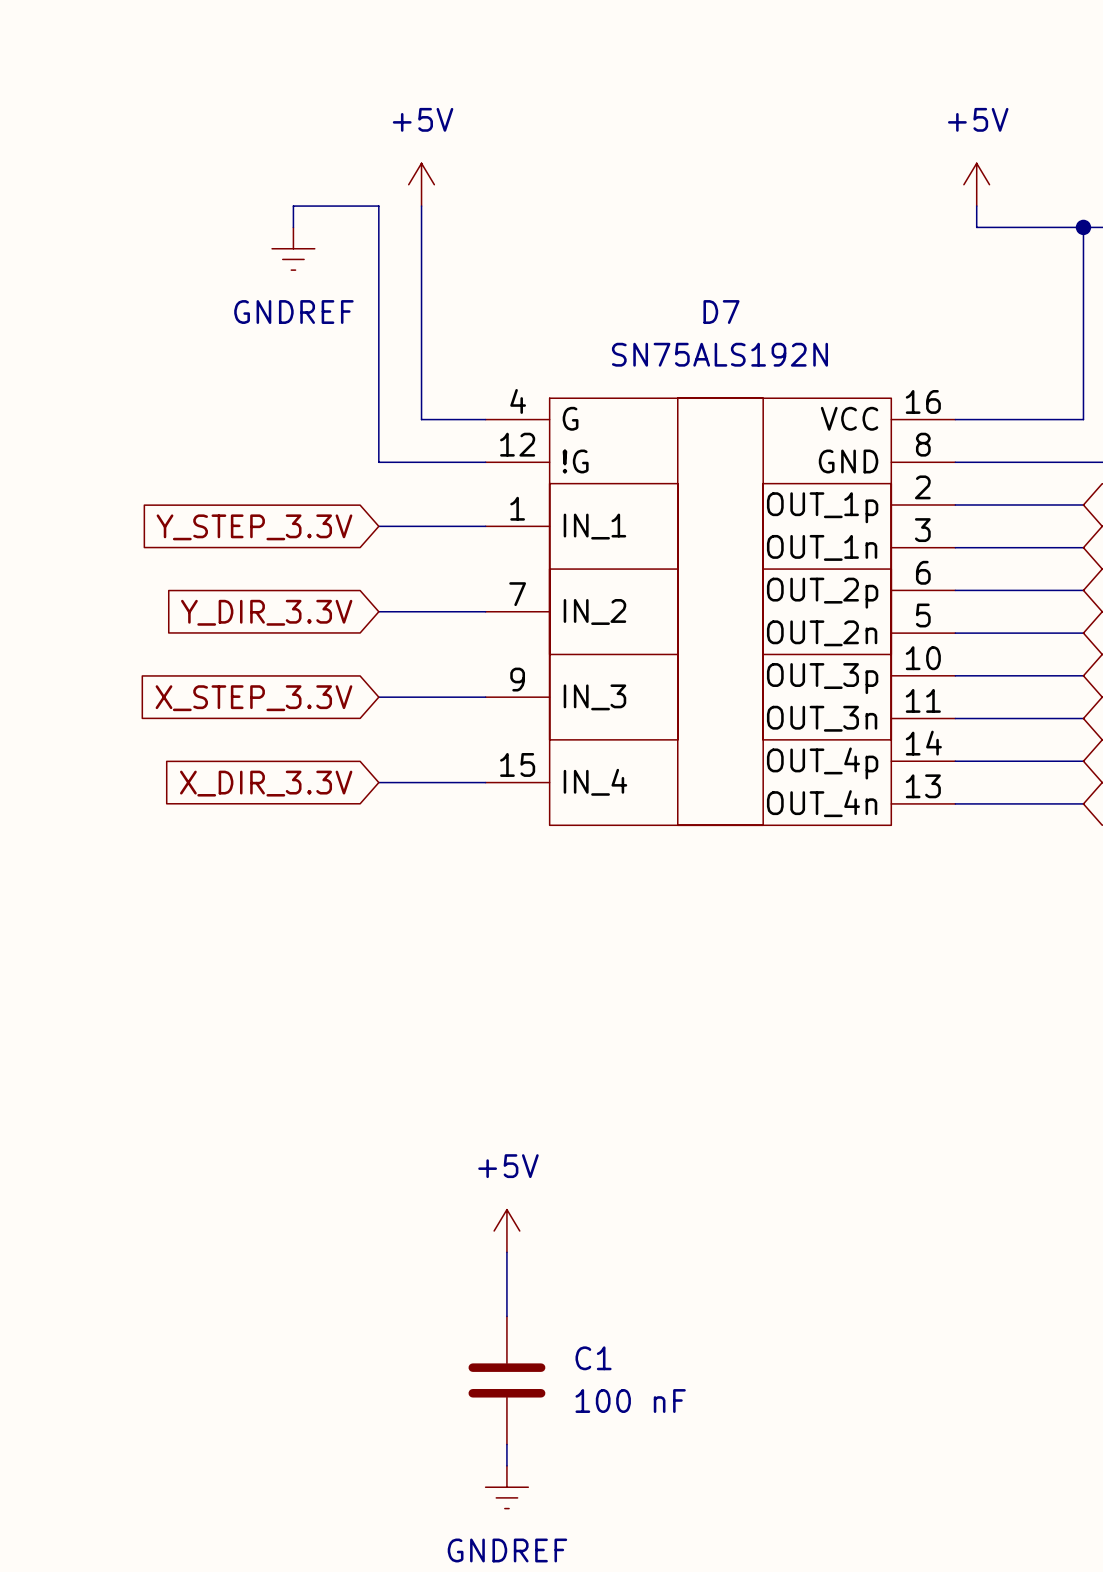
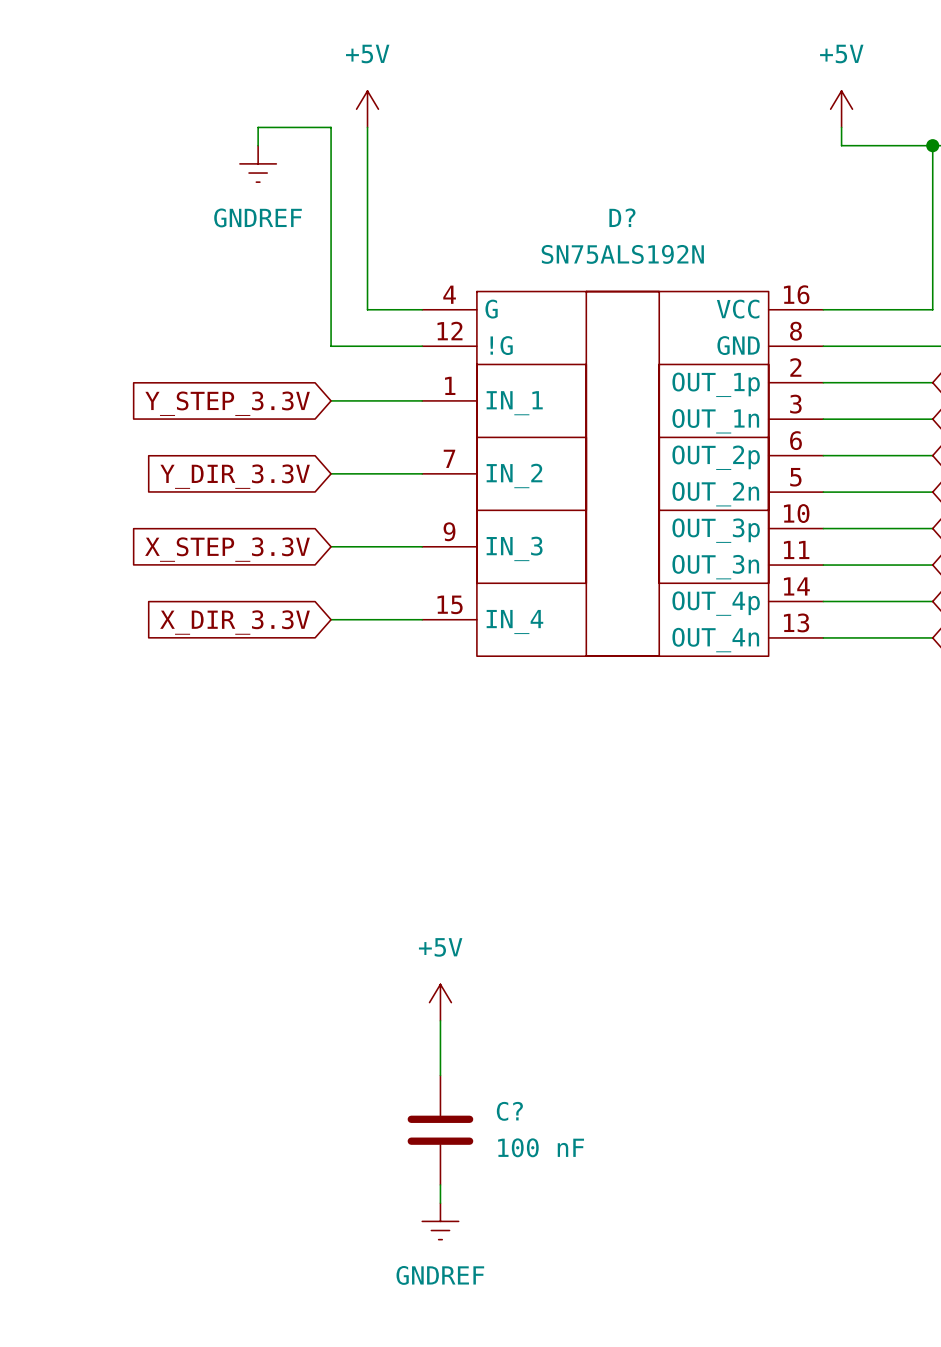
D7 name: D7 (721, 312) -> D? (622, 217)
C1 name: C1 (593, 1358) -> C? (509, 1111)

